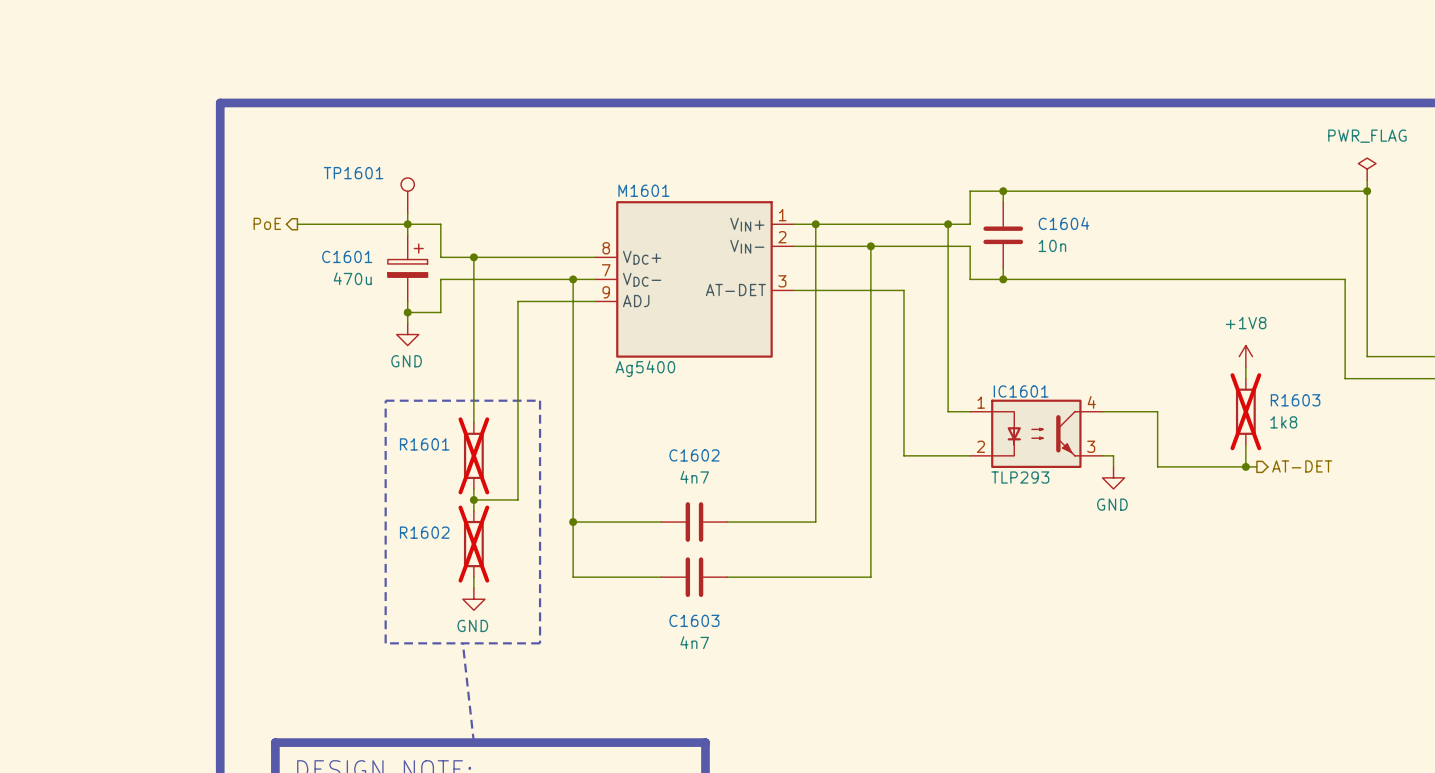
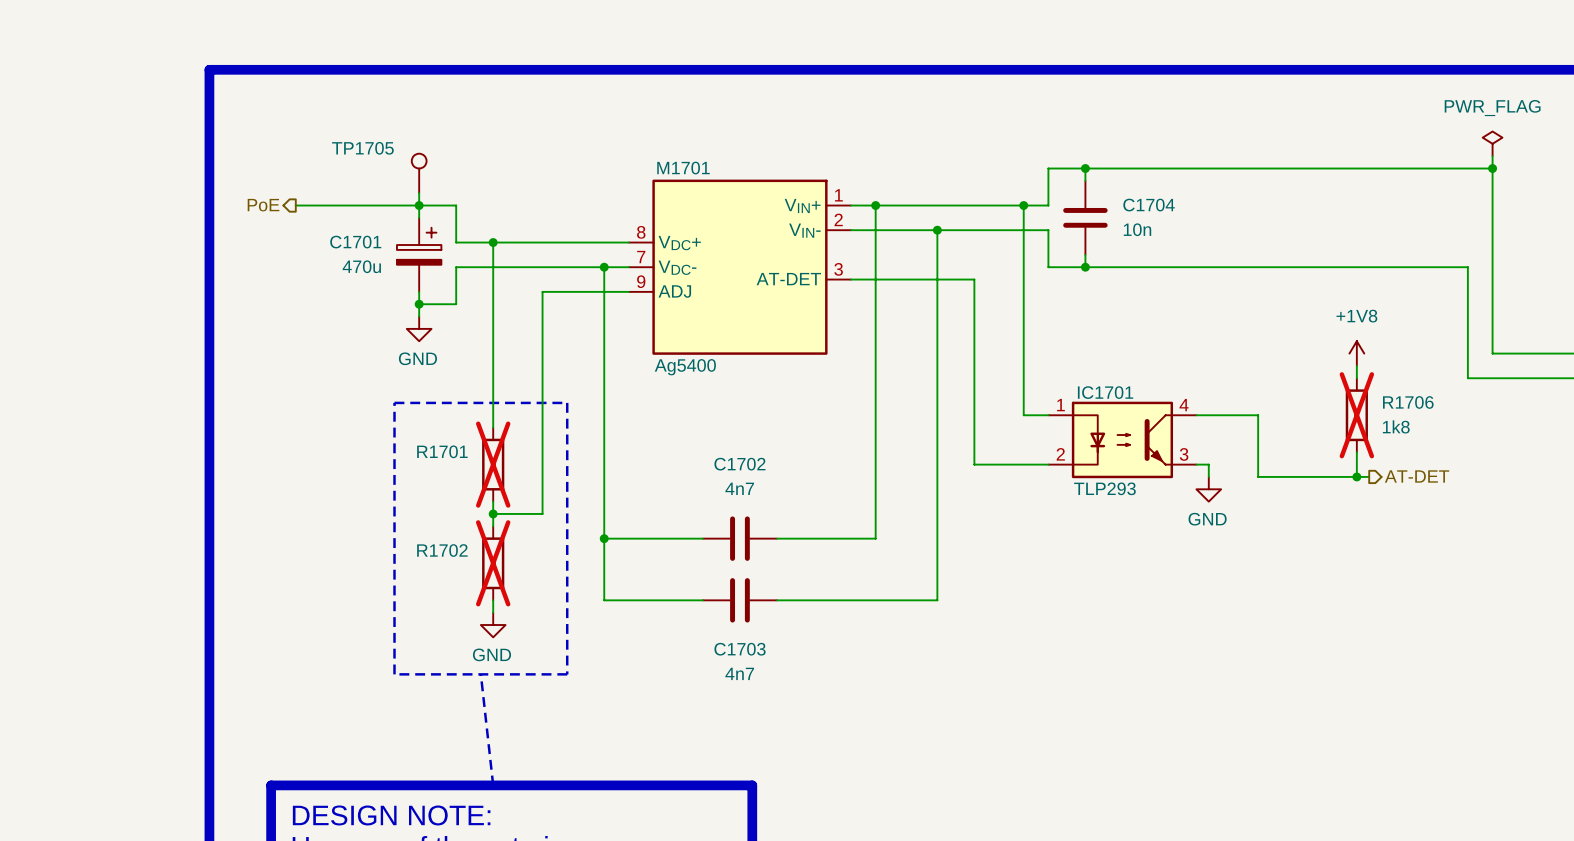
TP1601 name: TP1601 (353, 173) -> TP1705 (362, 148)
M1601 name: M1601 (643, 190) -> M1701 (683, 168)
C1604 name: C1604 (1063, 223) -> C1704 (1149, 205)
C1601 name: C1601 (347, 256) -> C1701 (355, 242)
IC1601 name: IC1601 (1021, 391) -> IC1701 (1105, 392)
R1603 name: R1603 (1295, 400) -> R1706 (1408, 402)
R1601 name: R1601 (424, 444) -> R1701 (442, 451)
C1602 name: C1602 (694, 455) -> C1702 (739, 464)
R1602 name: R1602 (424, 532) -> R1702 (442, 550)
C1603 name: C1603 (694, 620) -> C1703 (740, 649)

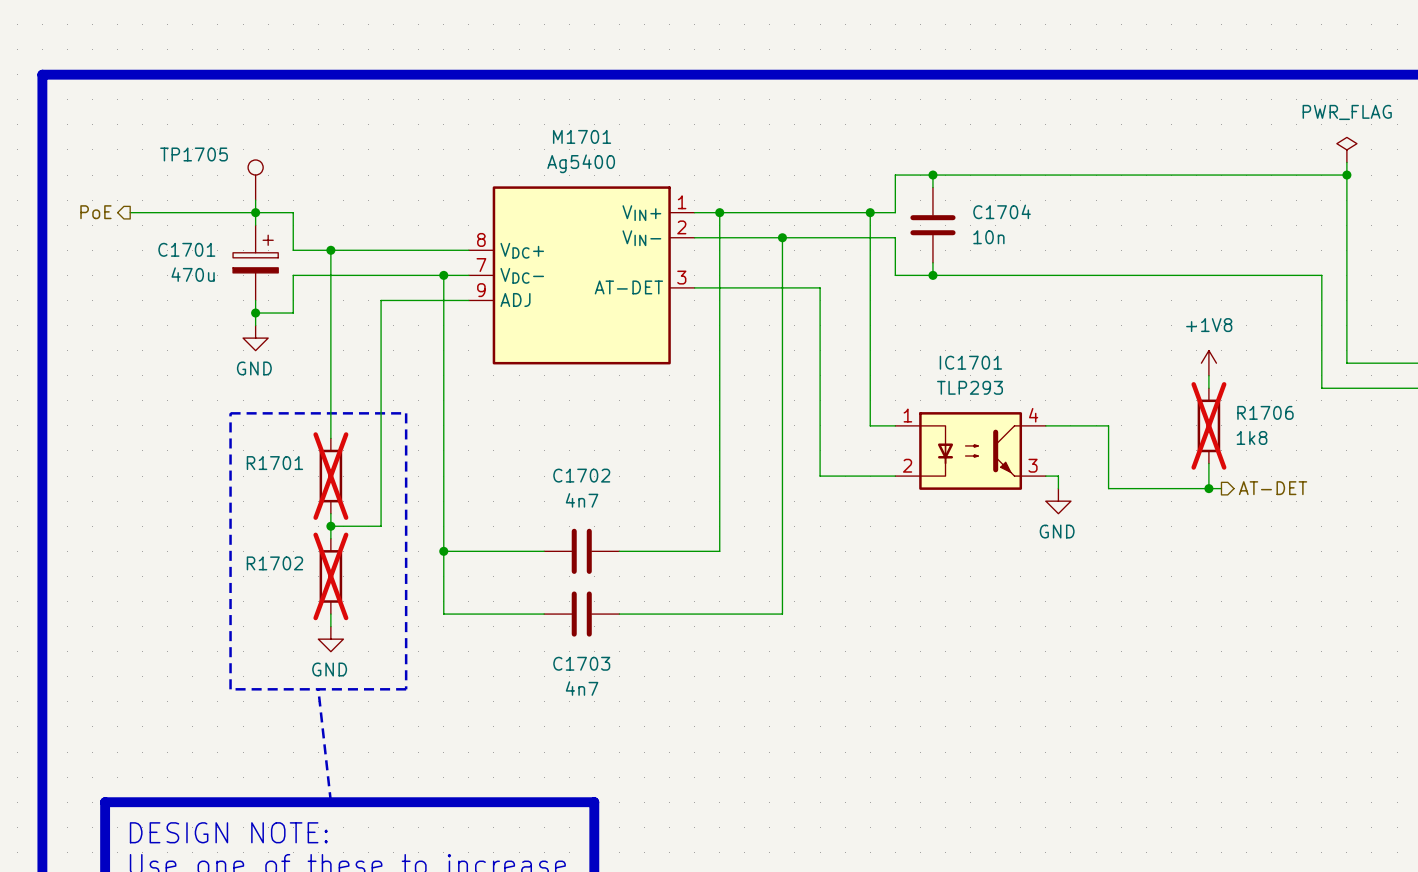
M1701 name position: M1701 (683, 168) -> M1701 (582, 136)
M1701 value position: Ag5400 (685, 367) -> Ag5400 (581, 163)
IC1701 name position: IC1701 (1105, 392) -> IC1701 (970, 362)
IC1701 value position: TLP293 (1104, 488) -> TLP293 (970, 387)

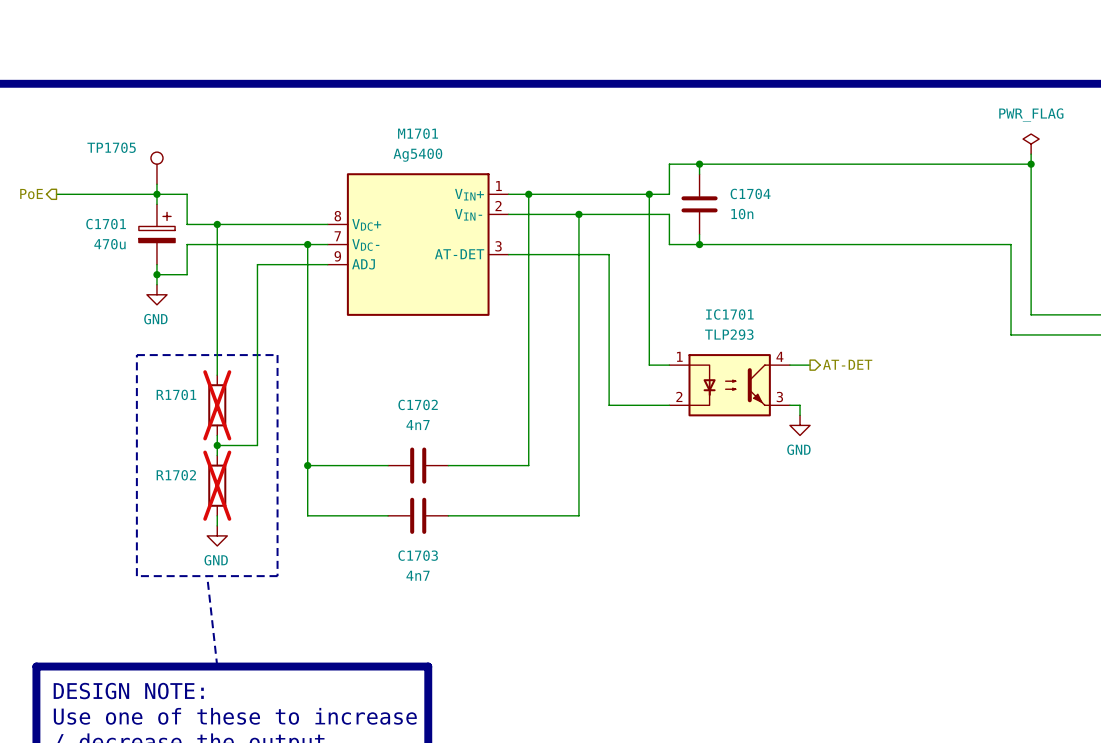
power symbol: +1V8 (1208, 363) -> none
wire: (1208, 375) (1208, 388) -> none
wire: (1070, 425) (1108, 425) (1108, 488) (1221, 488) -> none
R1706: 1k8 (1208, 425) -> none
wire: (1208, 463) (1208, 488) -> none
junction: (1208, 488) -> none
hierarchical label position: AT-DET (1273, 488) -> AT-DET (847, 364)

